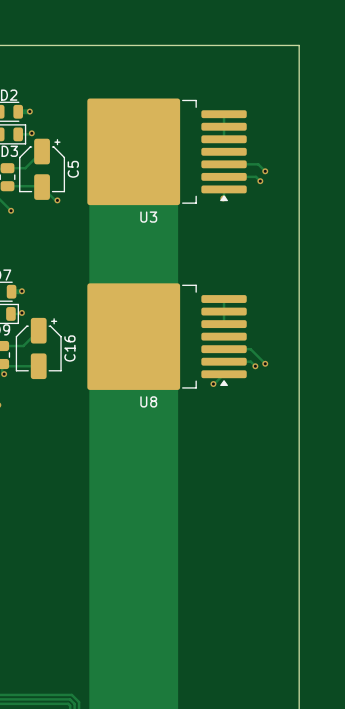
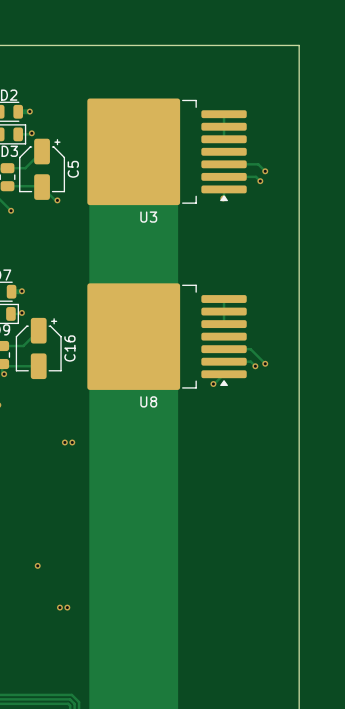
via: none -> (64, 442)
via: none -> (72, 442)
via: none -> (37, 565)
via: none -> (59, 607)
via: none -> (67, 607)

